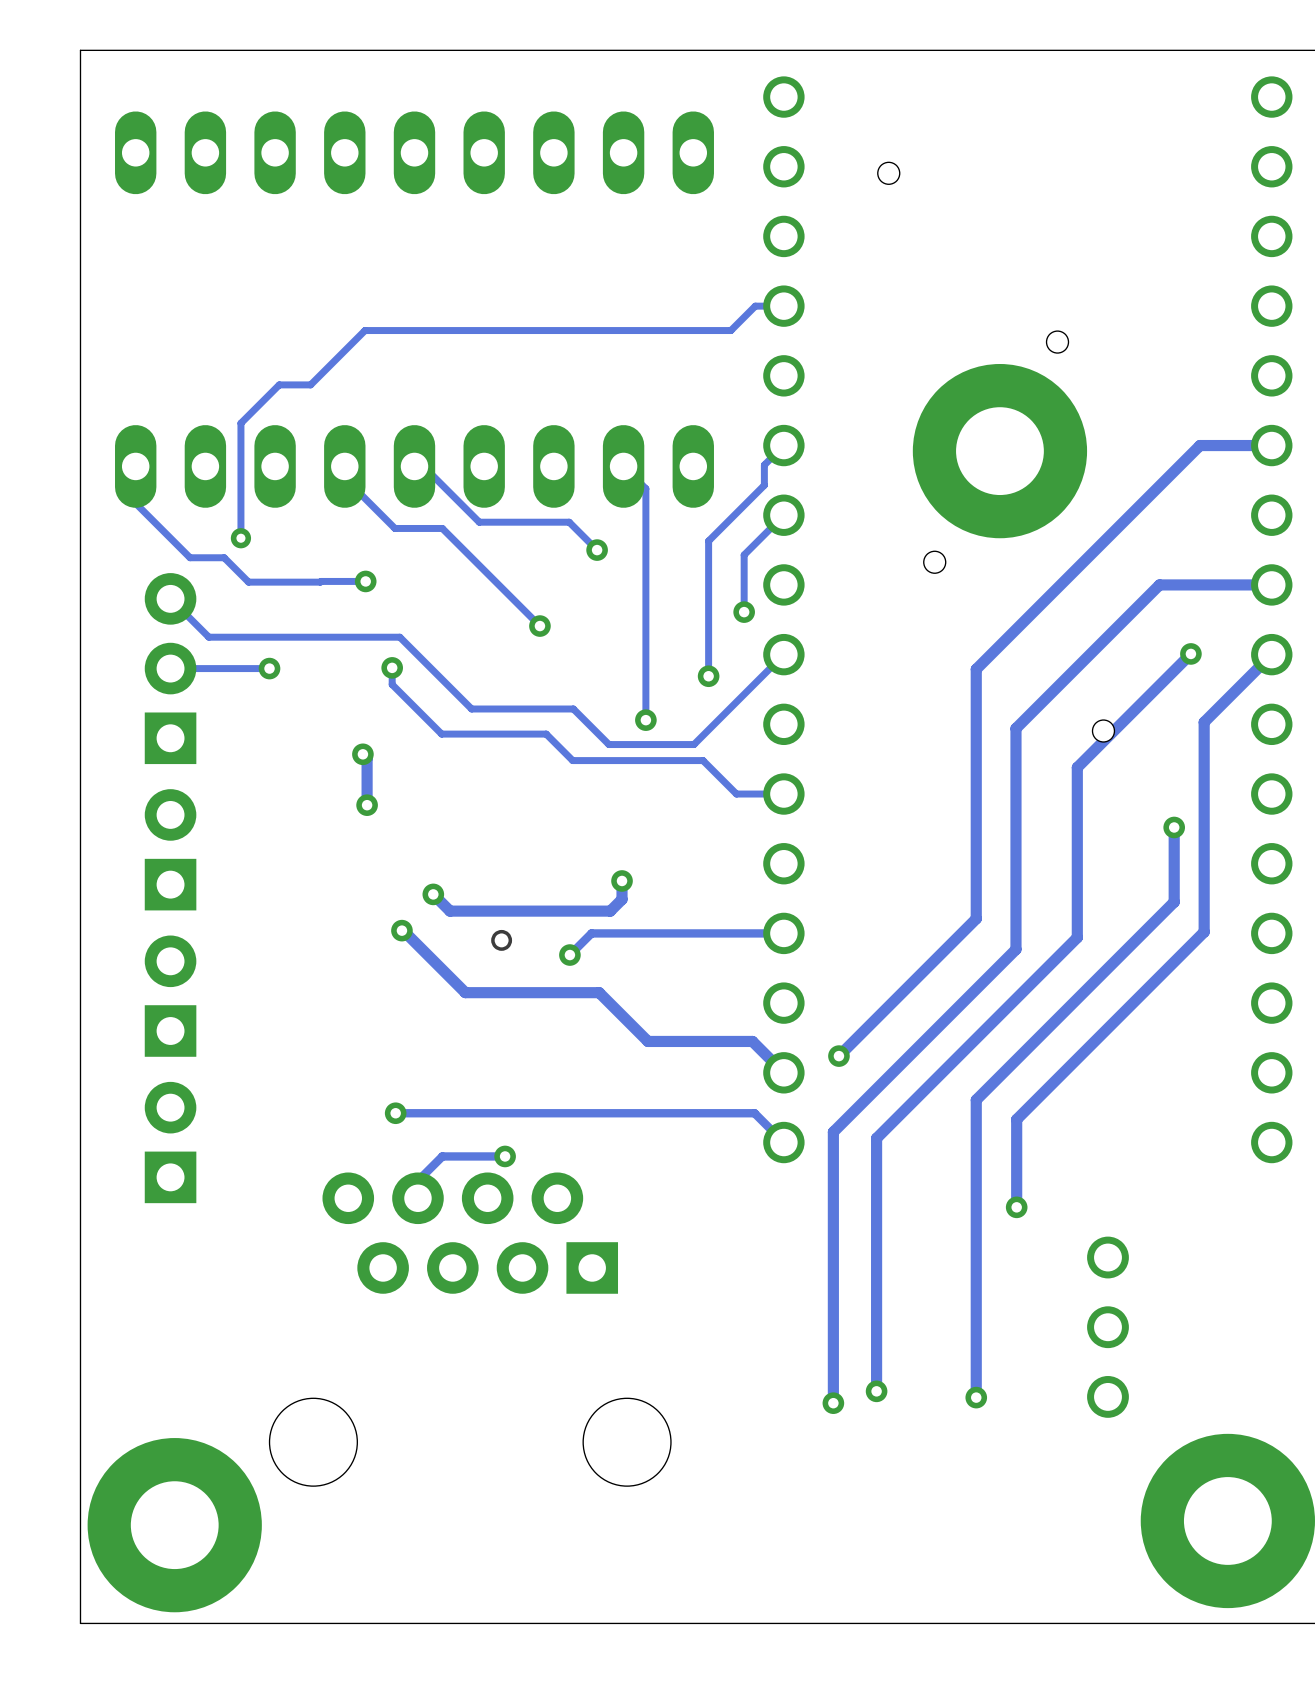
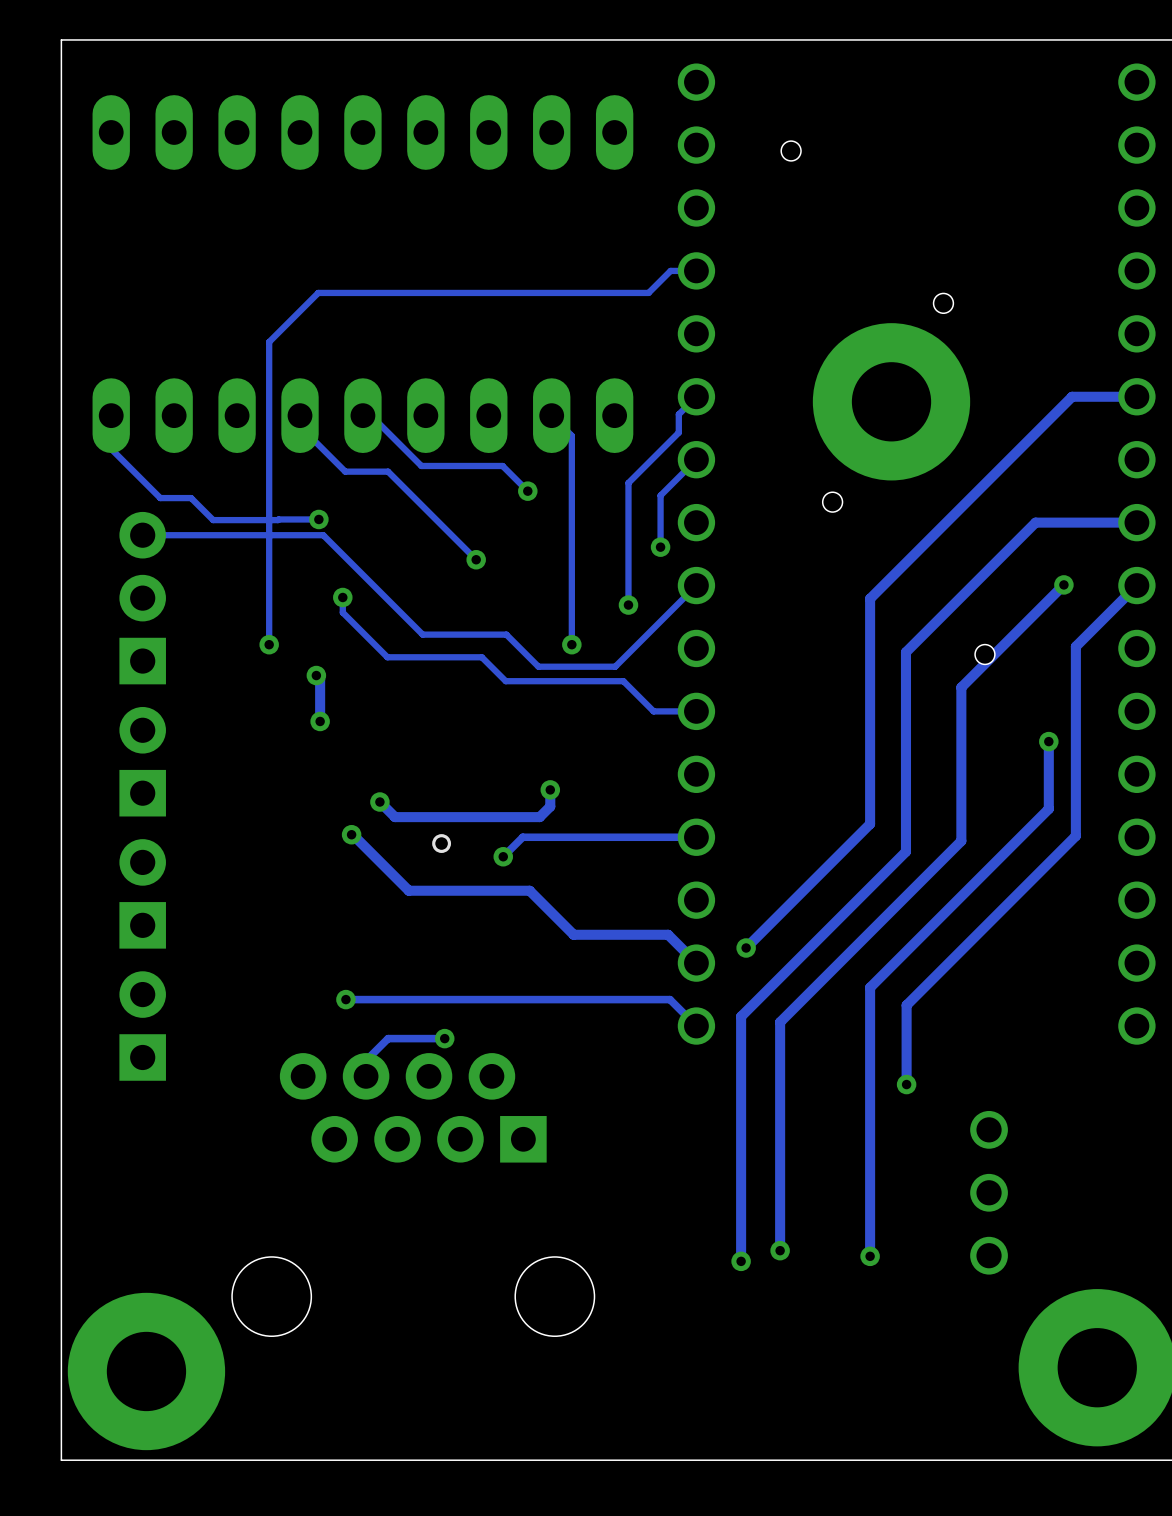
track: (310, 384) (279, 384) (240, 423) (240, 538) -> (269, 342) (269, 644)
via: (240, 538) -> none
track: (170, 598) (208, 637) (399, 637) (471, 708) (480, 708) -> (142, 535) (323, 535) (422, 634)
track: (269, 668) (170, 668) -> none
via position: (269, 668) -> (269, 644)

